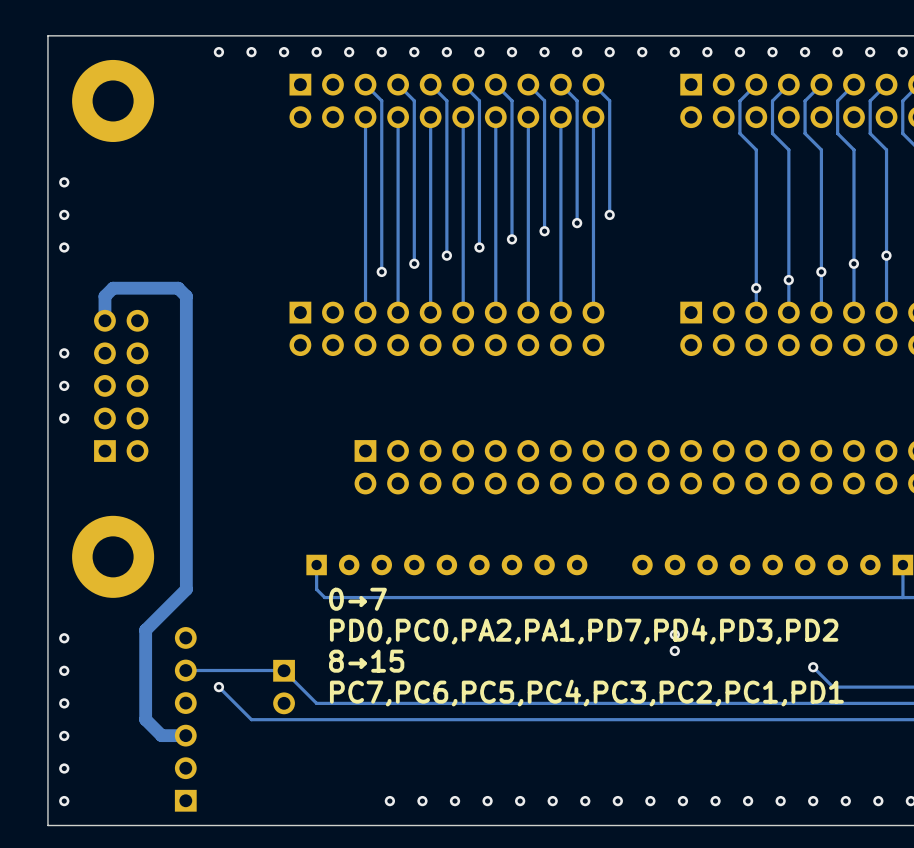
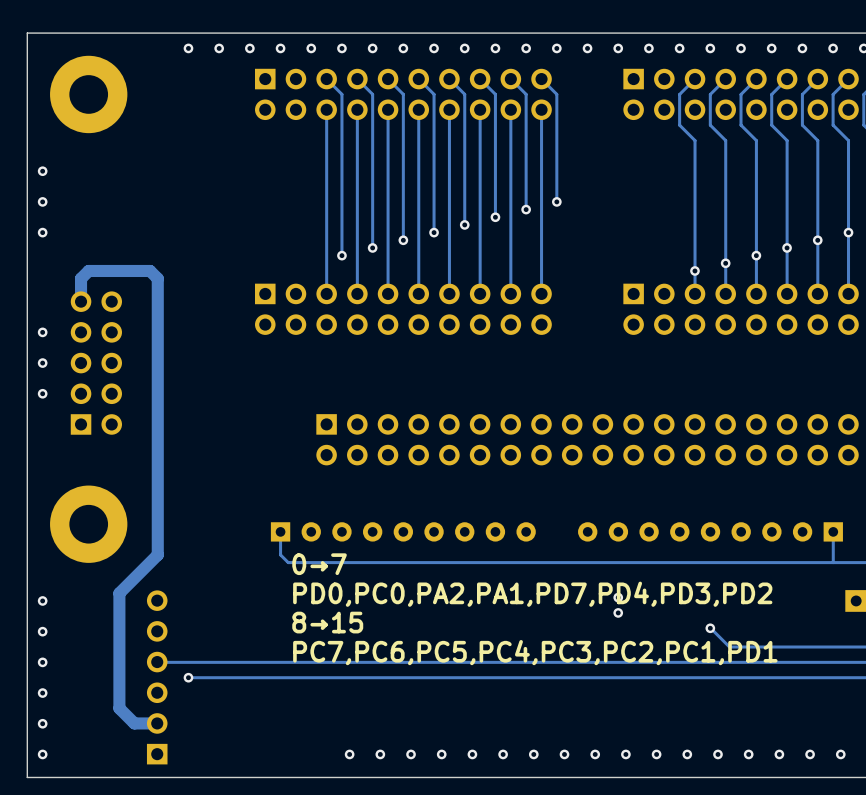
track: (813, 667) (833, 687) -> (710, 628) (729, 647) (767, 647)
via position: (813, 667) -> (710, 628)
track: (283, 670) (185, 670) -> none
track: (284, 670) (316, 703) -> (157, 662) (280, 662)
track: (218, 687) (251, 719) -> (188, 677) (219, 677)
via position: (218, 687) -> (188, 677)
part: (284, 687) -> none
track: (145, 719) (161, 735) (185, 735) -> (119, 677) (119, 708) (134, 723) (157, 723)

